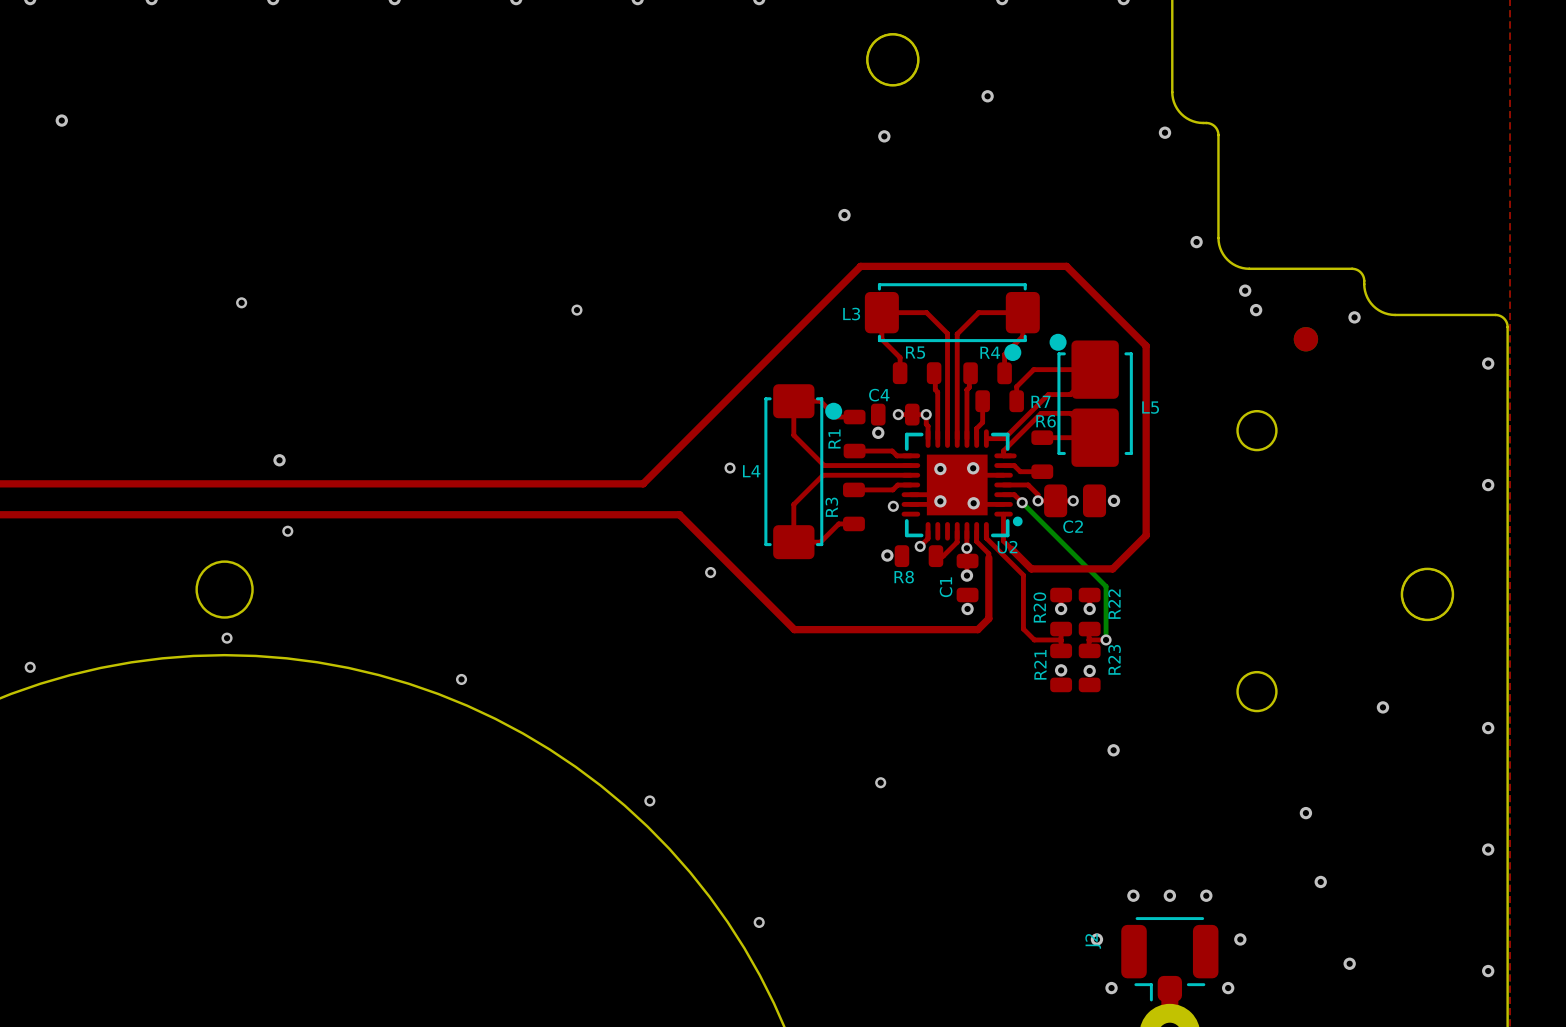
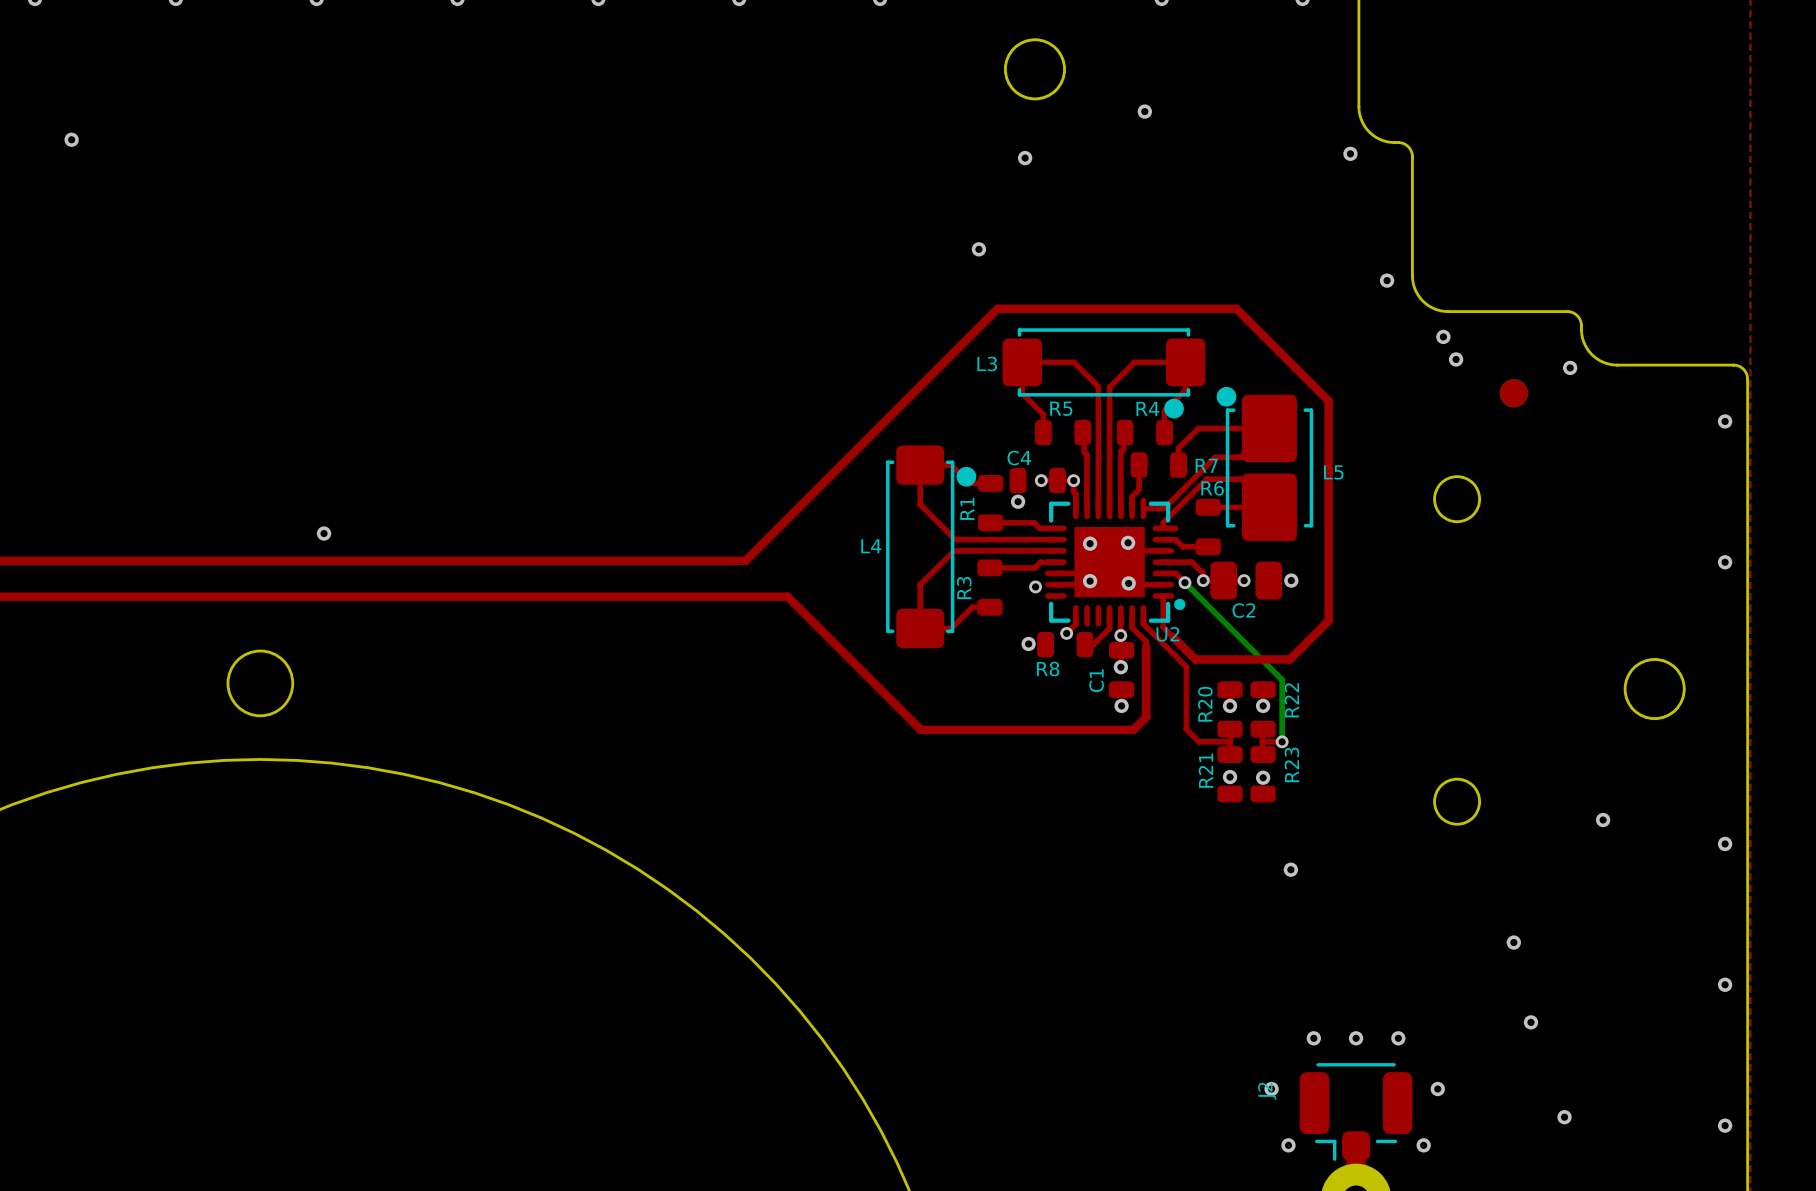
via: (241, 302) -> none
via: (576, 310) -> none
via: (730, 468) -> none
via: (287, 531) -> none
via: (710, 572) -> none
via: (227, 638) -> none
via: (30, 667) -> none
via: (461, 679) -> none
via: (880, 782) -> none
via: (649, 800) -> none
via: (759, 922) -> none

